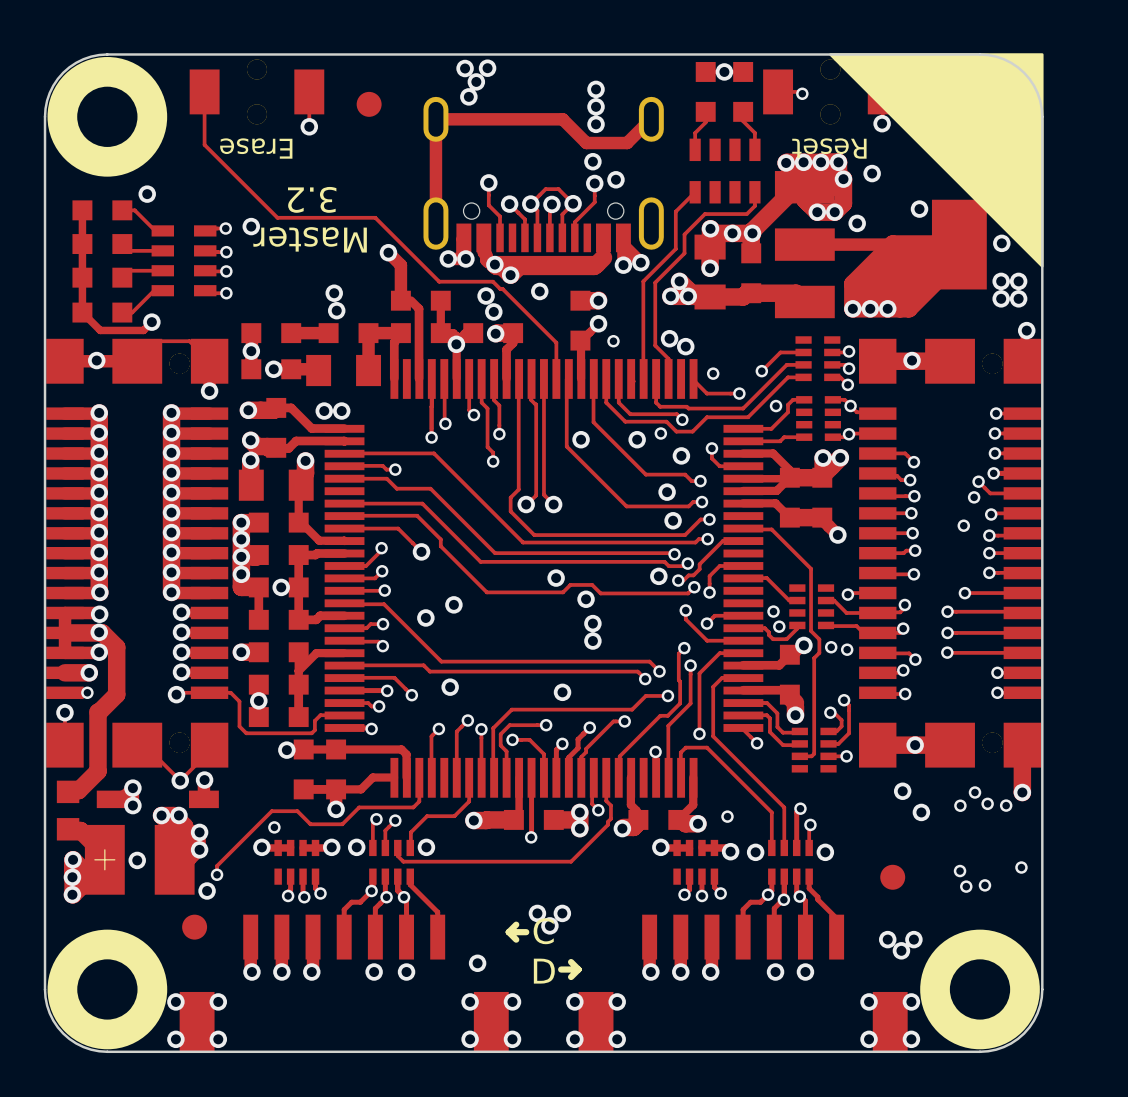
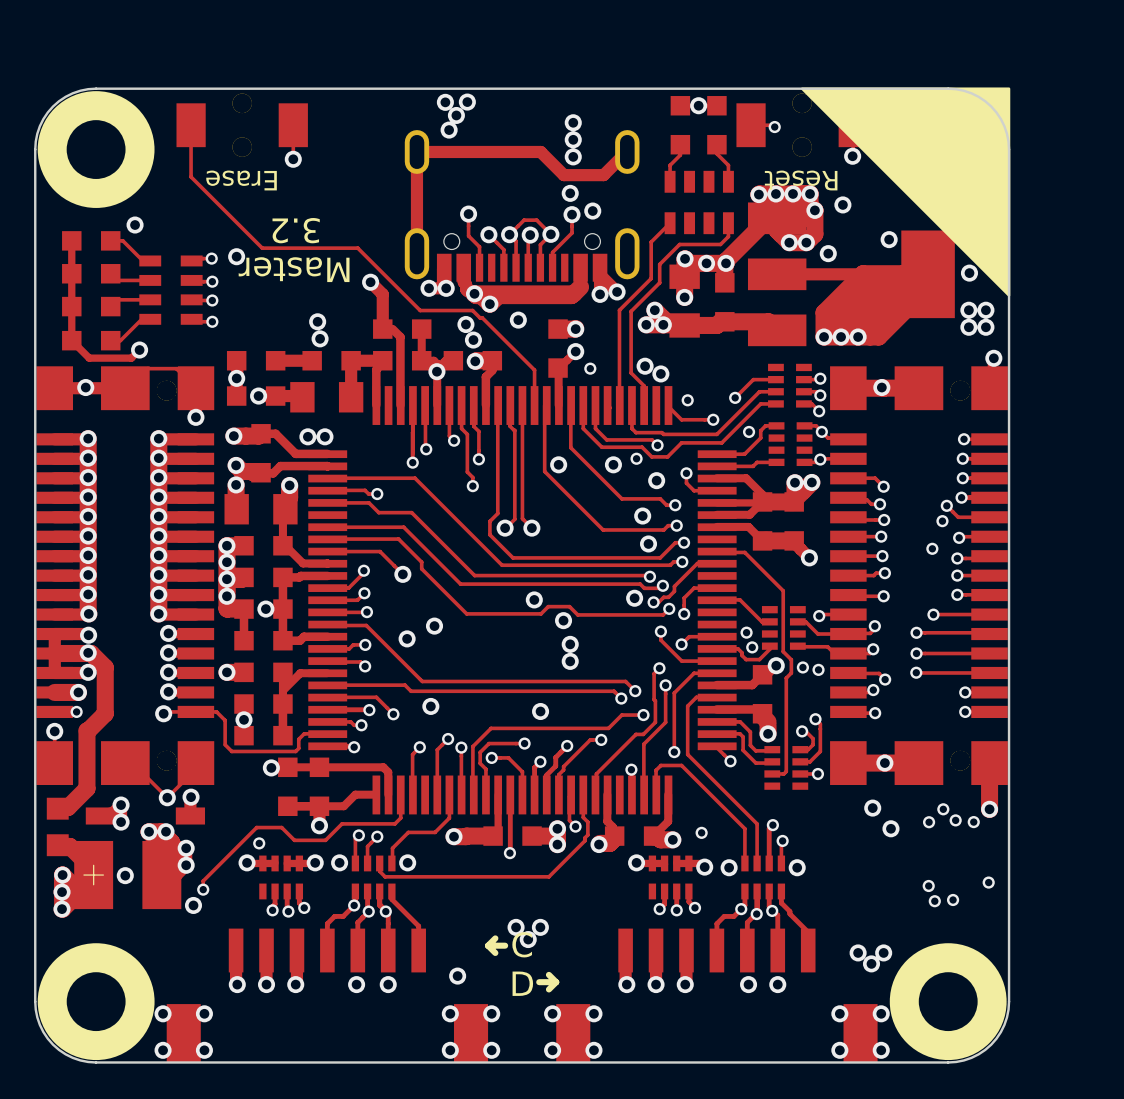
part: (369, 104) -> none
part: (892, 877) -> none
part: (194, 927) -> none

